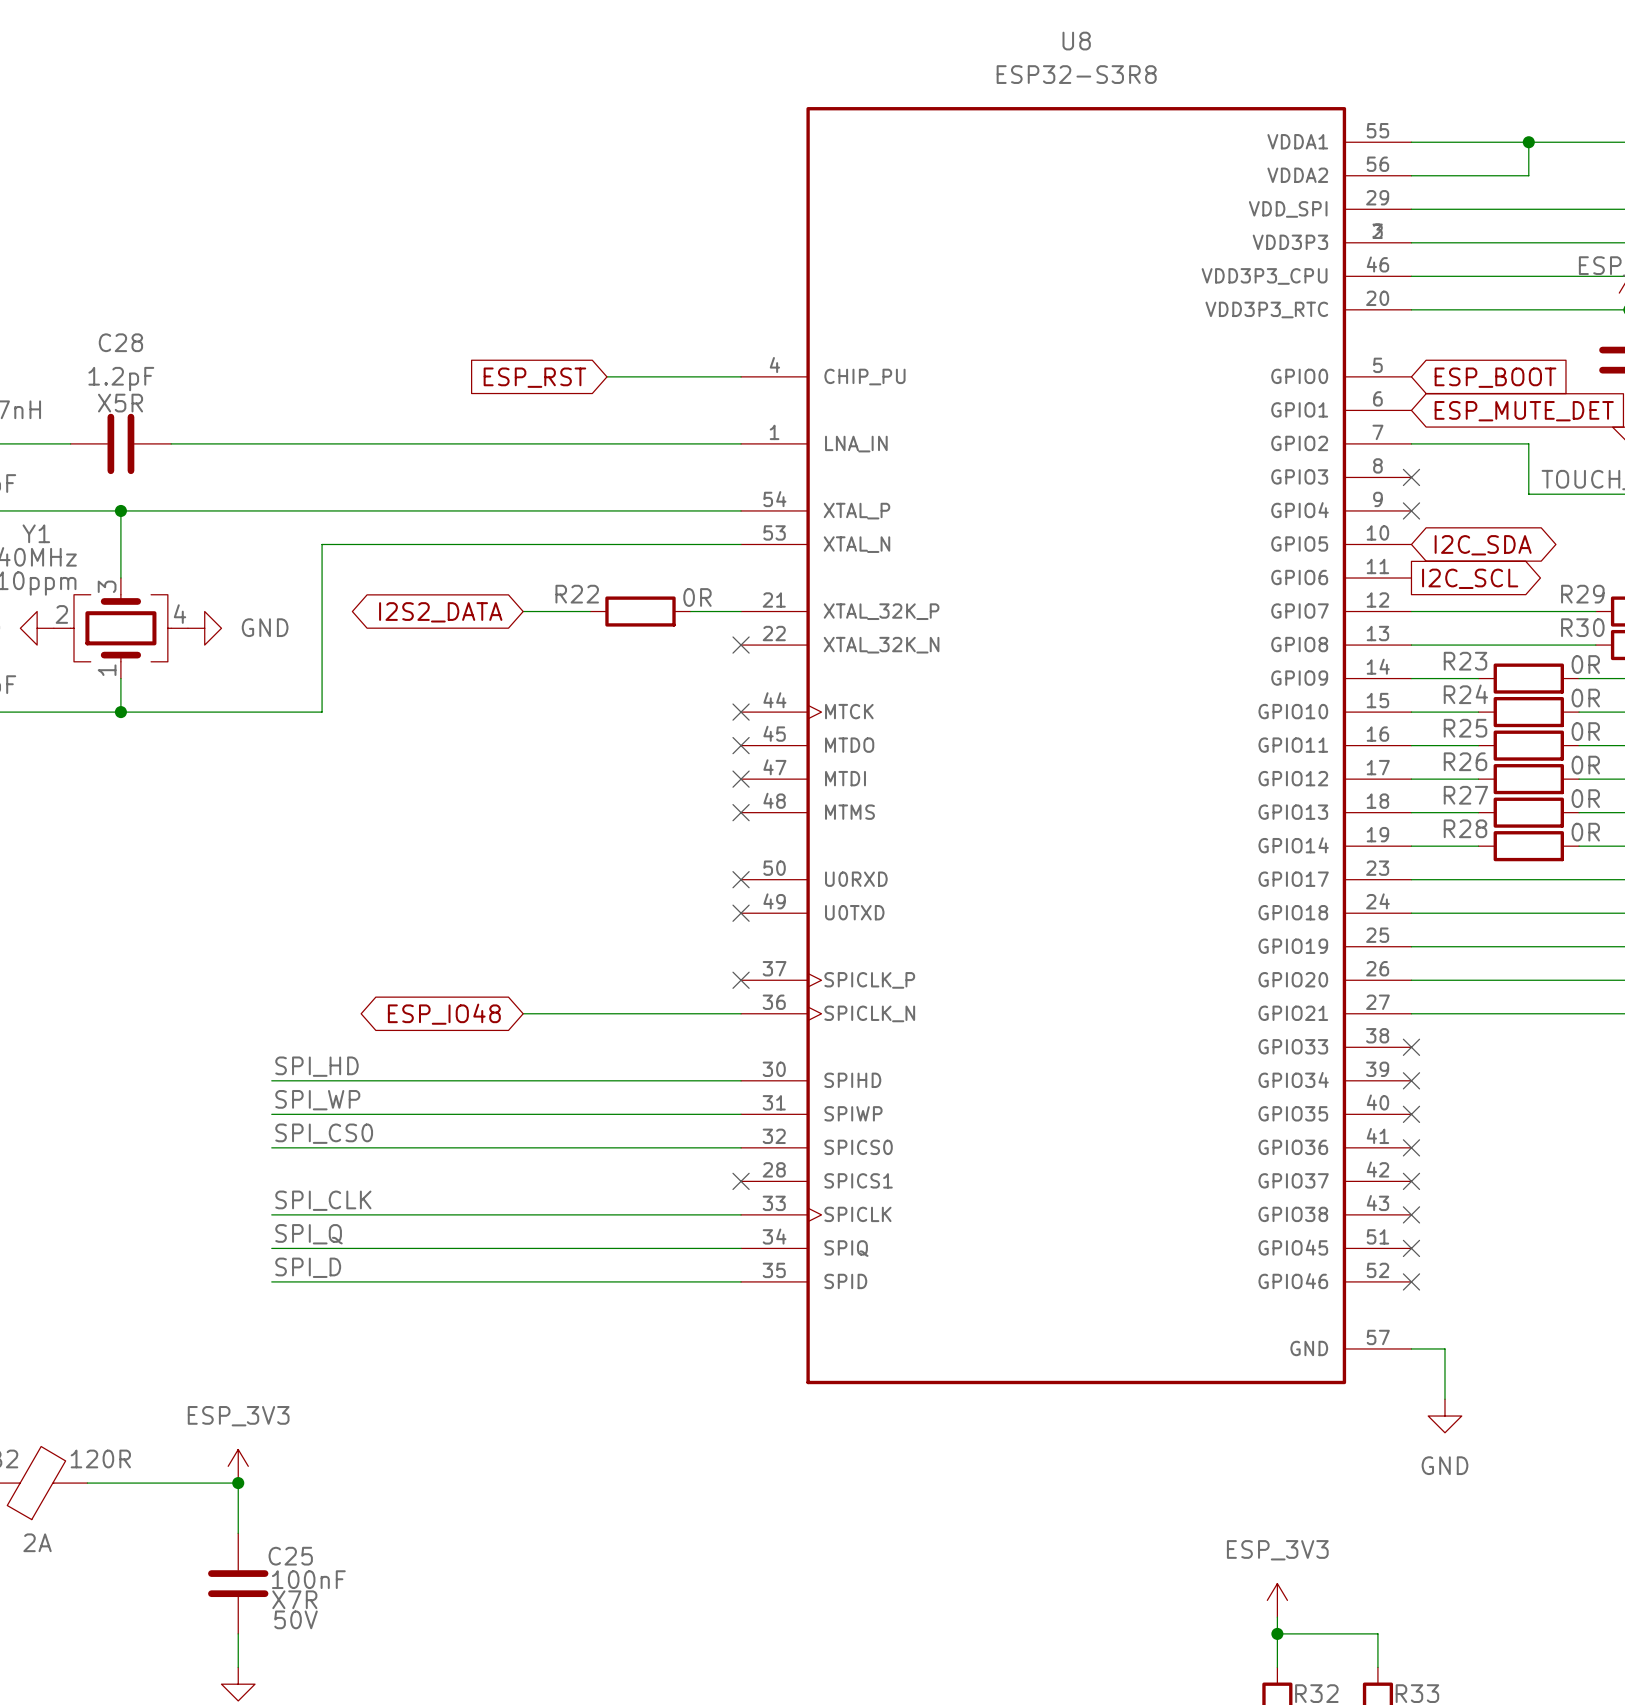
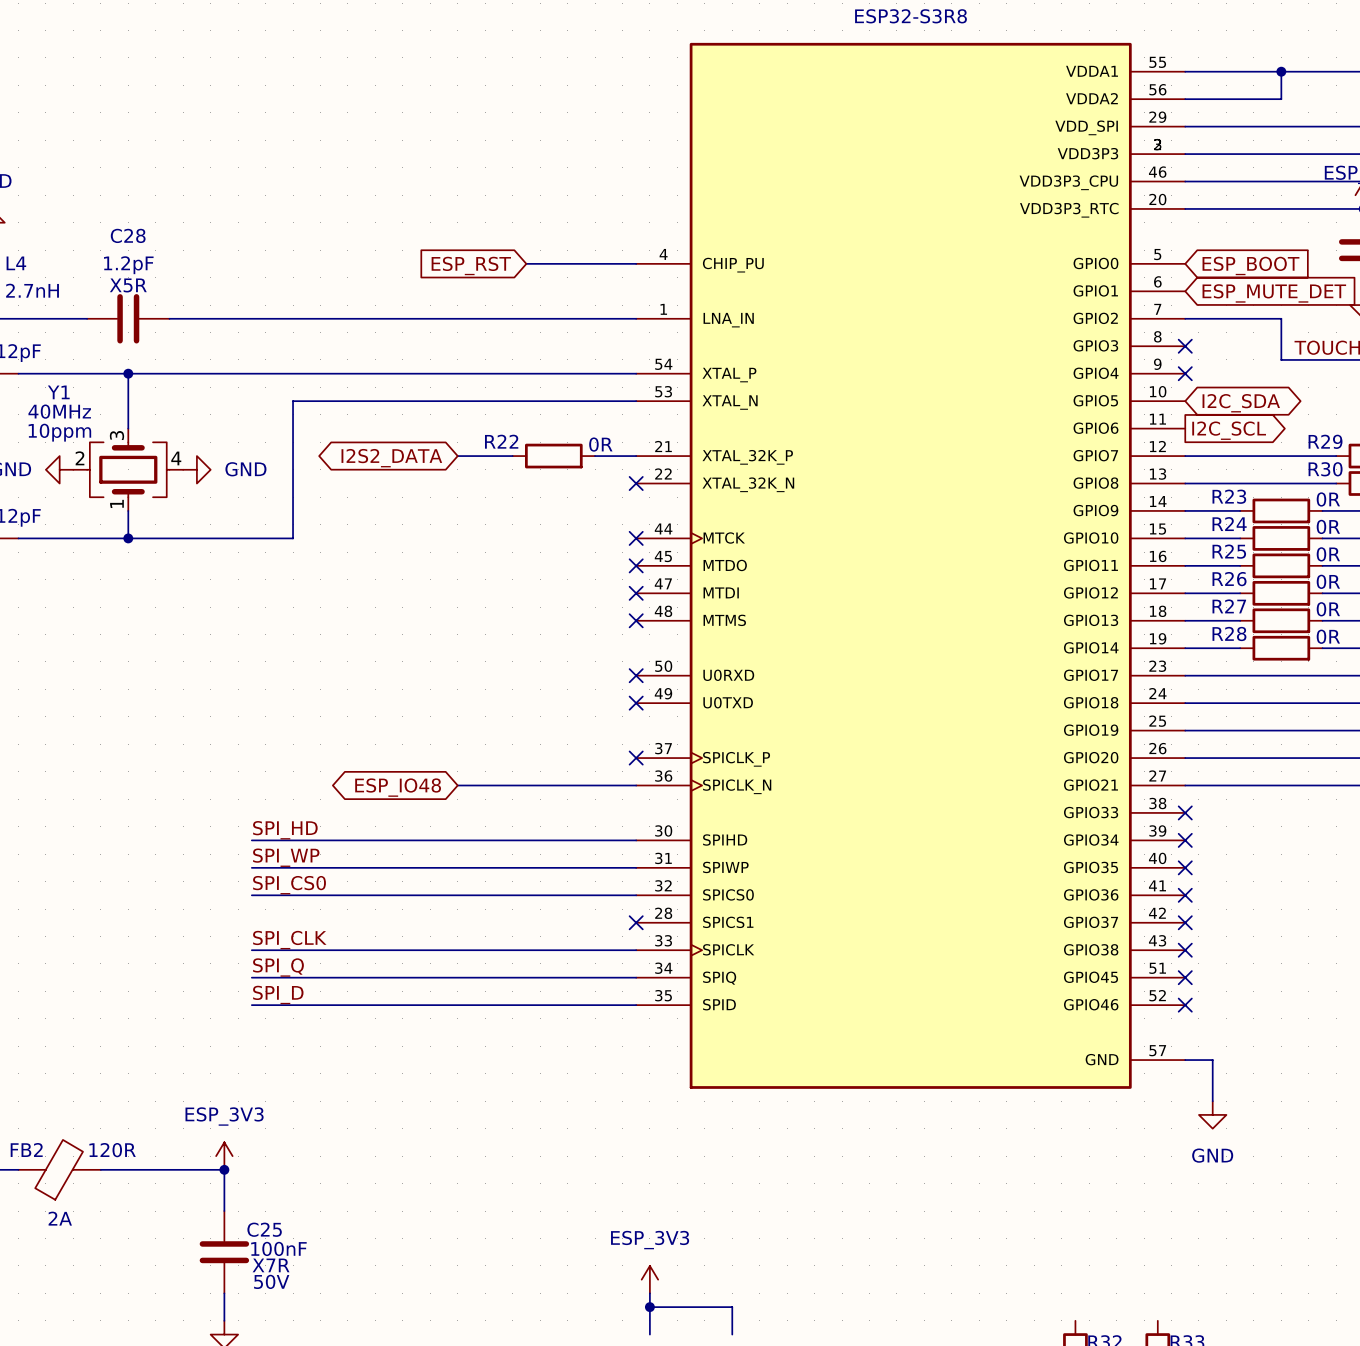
power symbol: ESP_3V3 (1277, 1600) -> none
power symbol: none -> ESP_3V3 (649, 1279)
wire: (1277, 1617) (1277, 1667) -> none
wire: none -> (649, 1293) (649, 1334)
wire: (1277, 1633) (1377, 1633) (1377, 1667) -> none
junction: (1277, 1633) -> none
wire: none -> (649, 1307) (732, 1307) (732, 1334)
junction: none -> (649, 1307)

